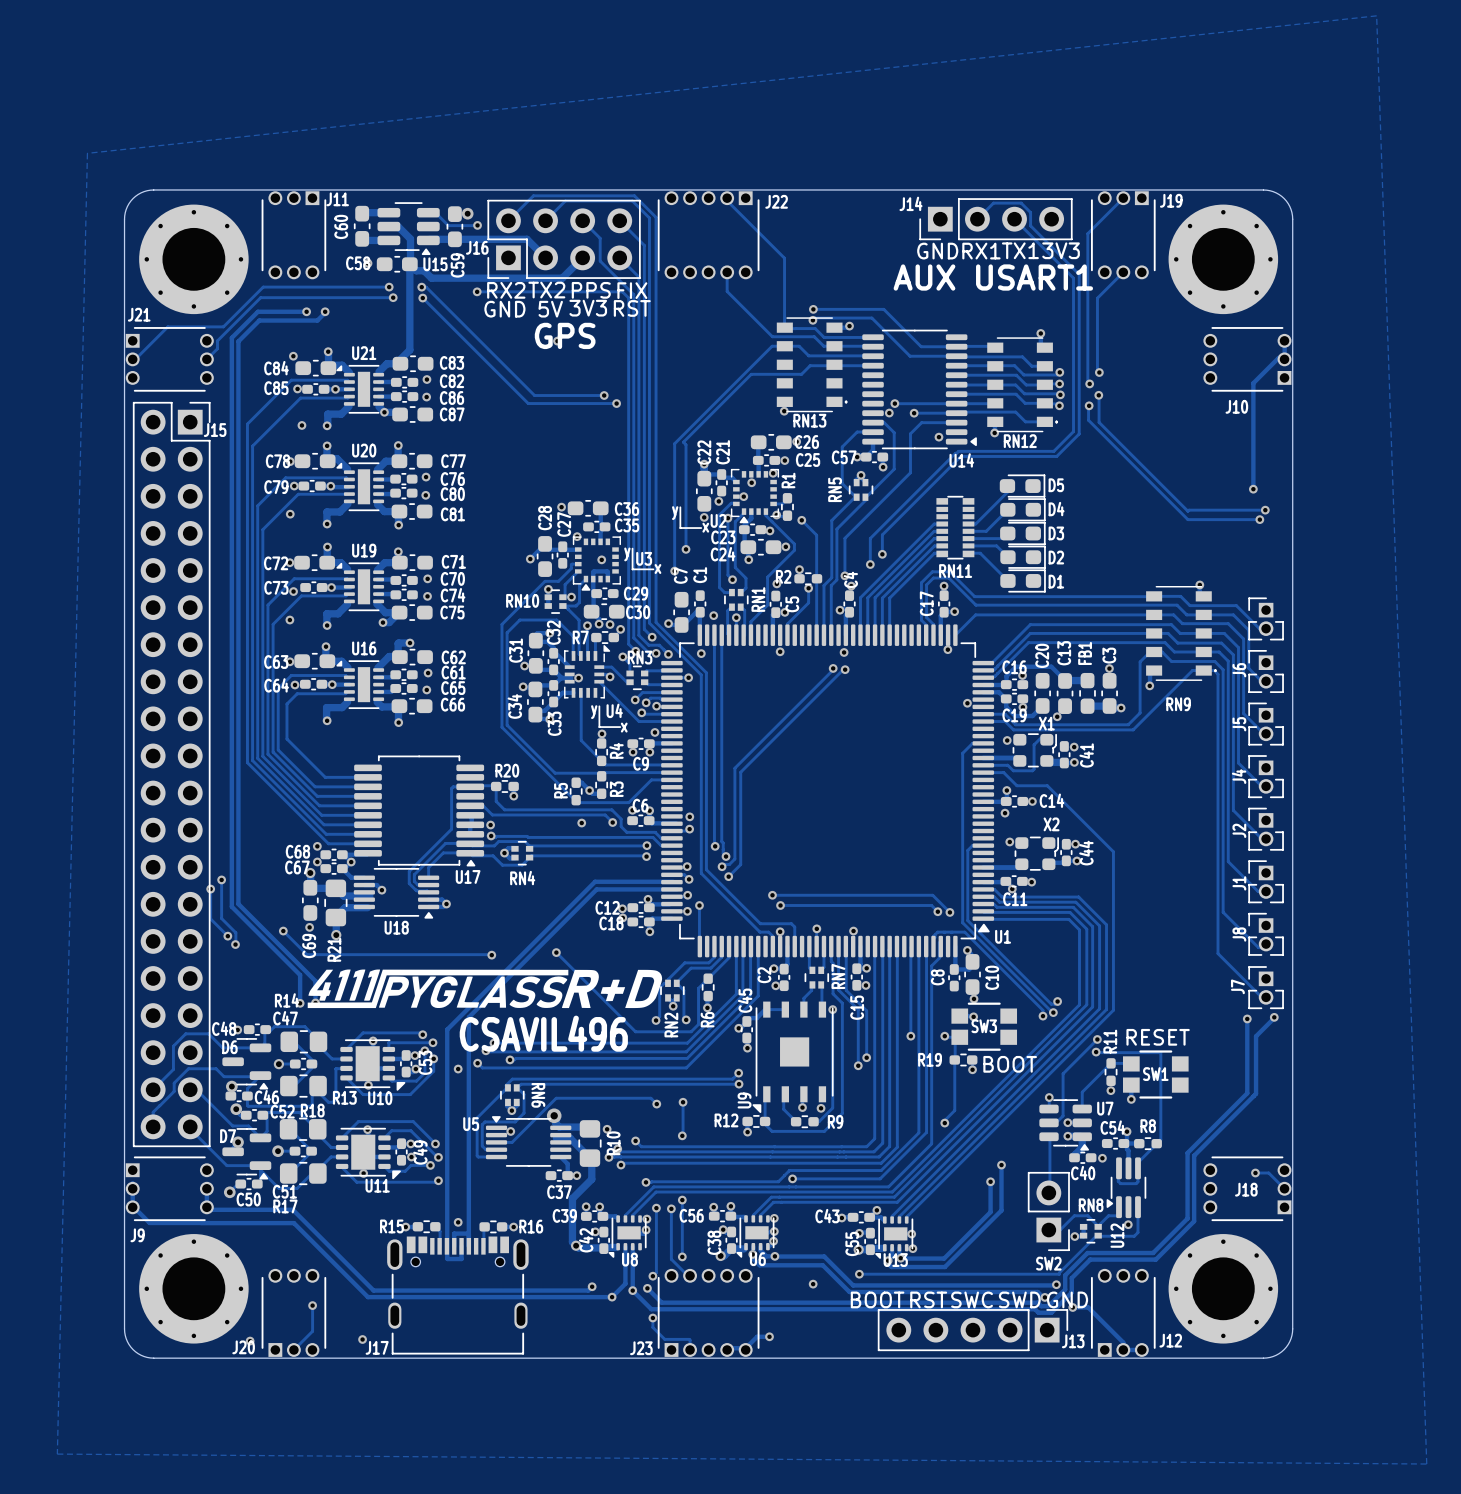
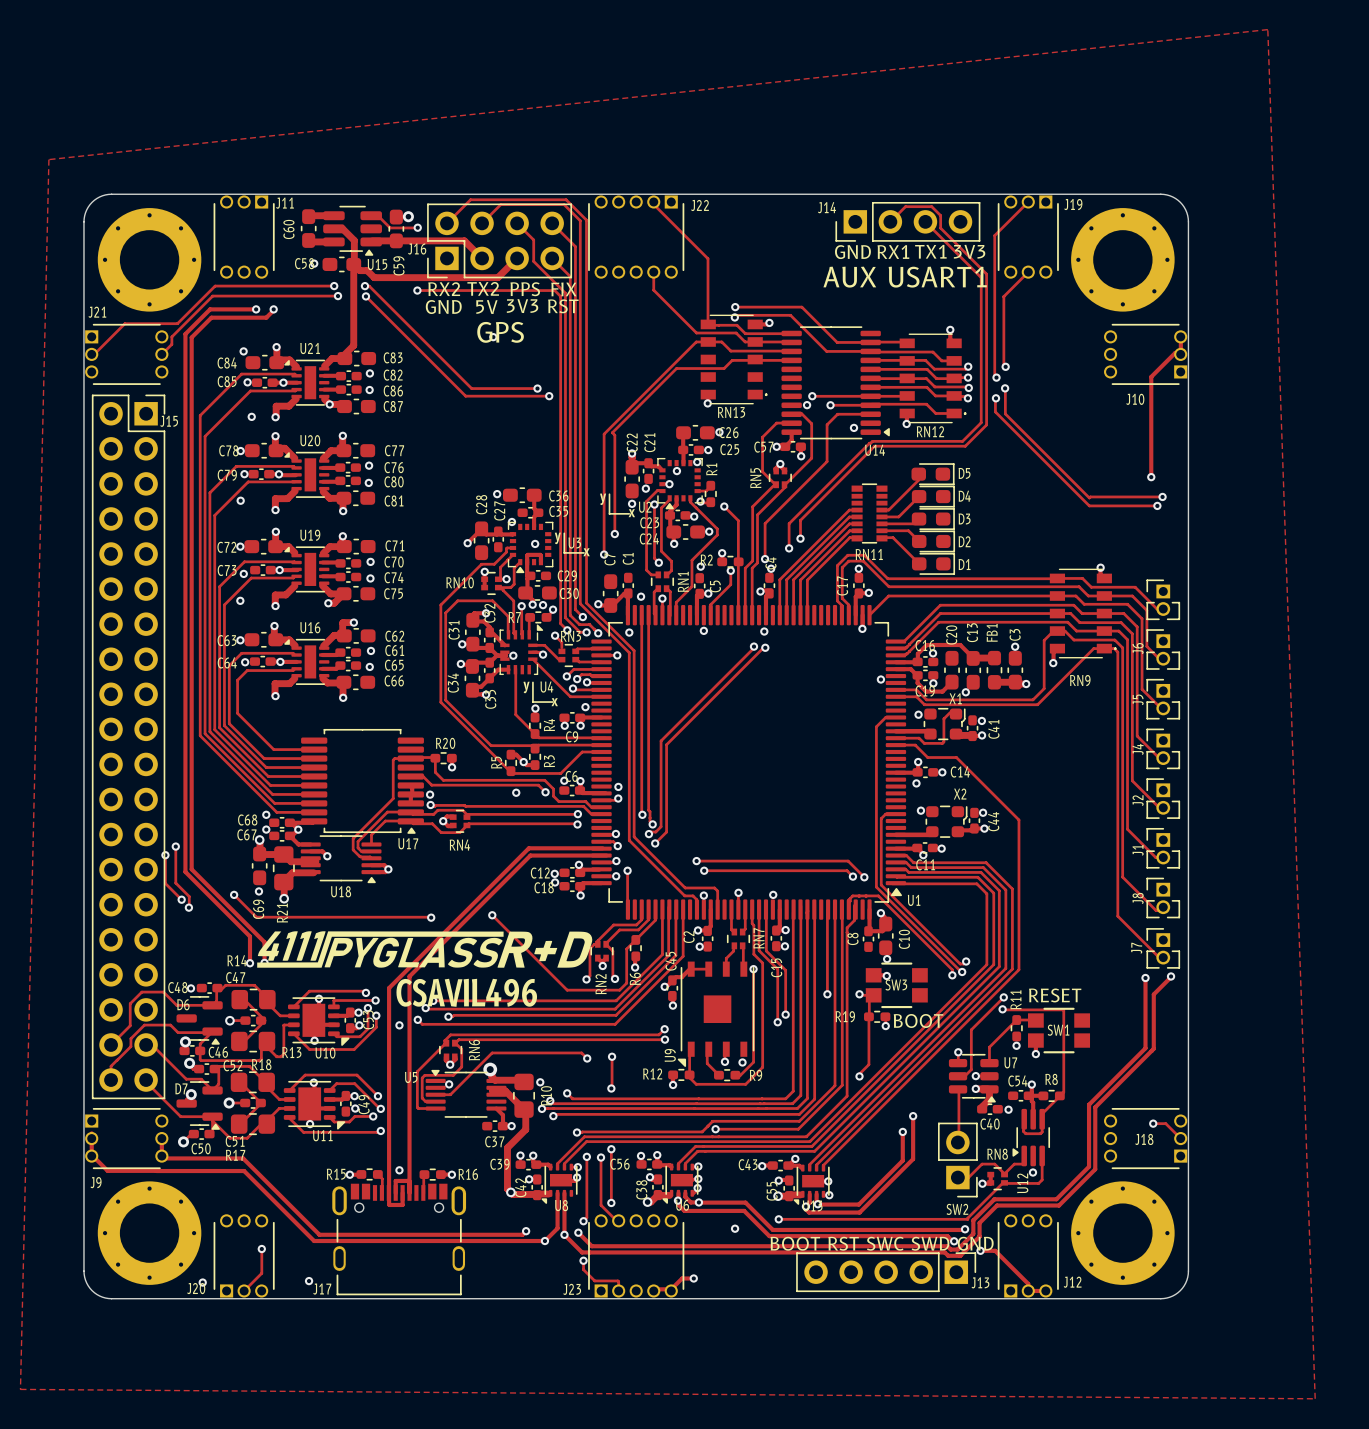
RN6 name rotation: 0° (538, 1095) -> 180° (474, 1050)

